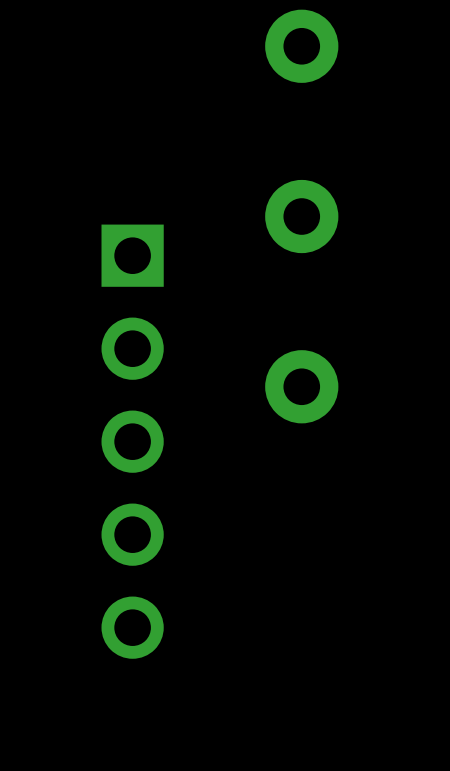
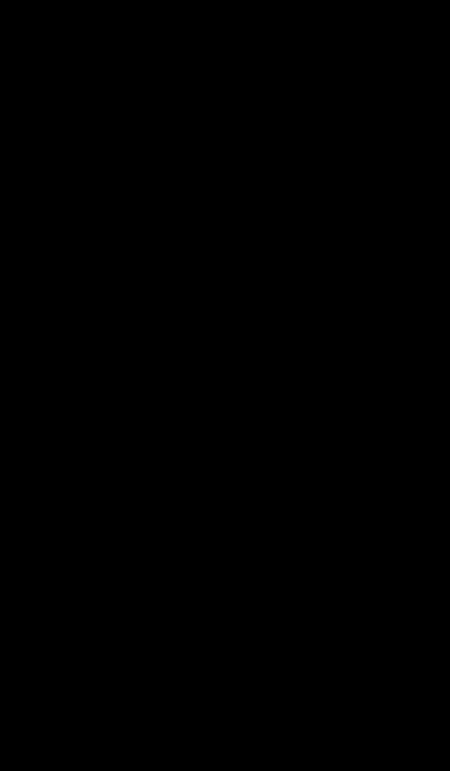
part: (301, 46) -> none
part: (301, 216) -> none
part: (301, 386) -> none
part: (132, 441) -> none

